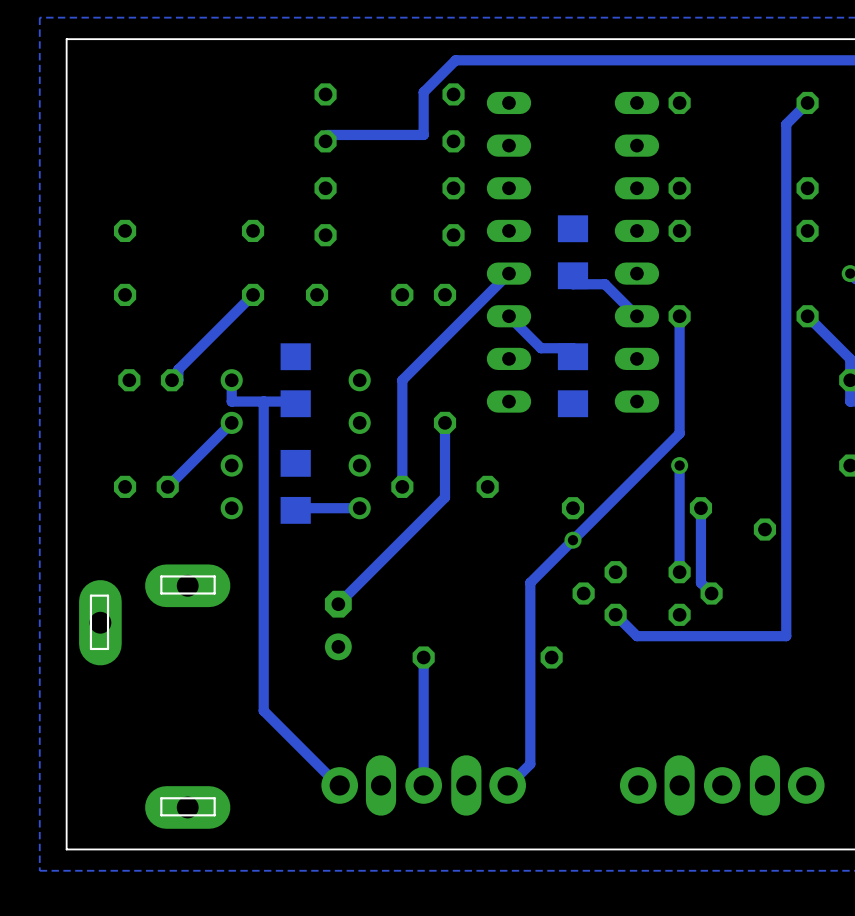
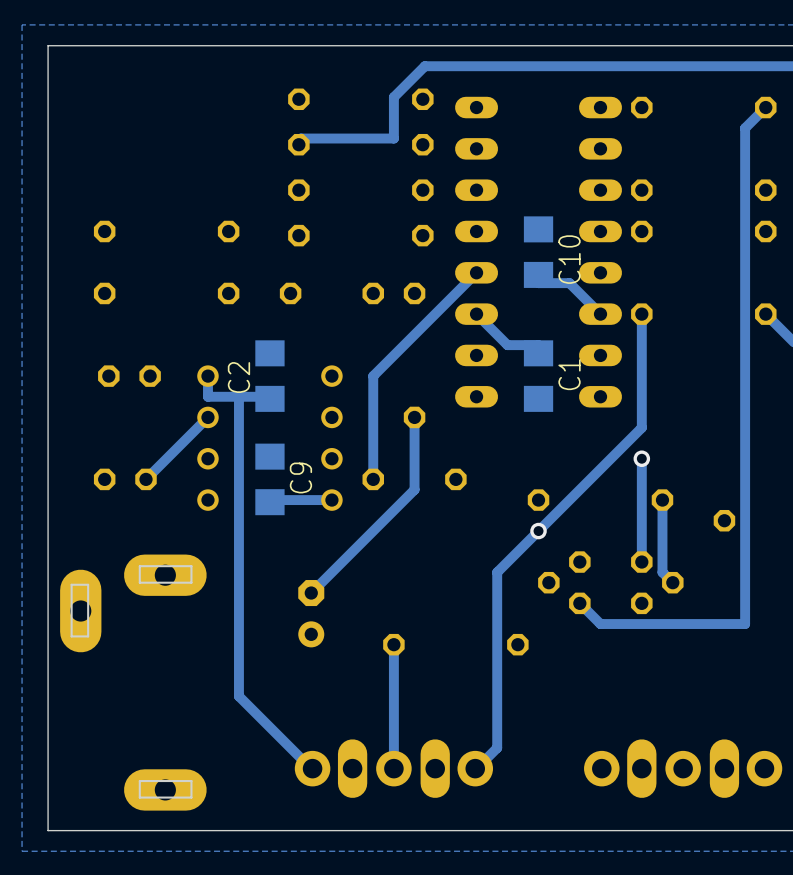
C10 name: none -> C10 (569, 259)
track: (253, 294) (178, 369) (178, 380) (172, 380) -> none
C1 name: none -> C1 (569, 374)
C2 name: none -> C2 (238, 377)
C9 name: none -> C9 (300, 477)

